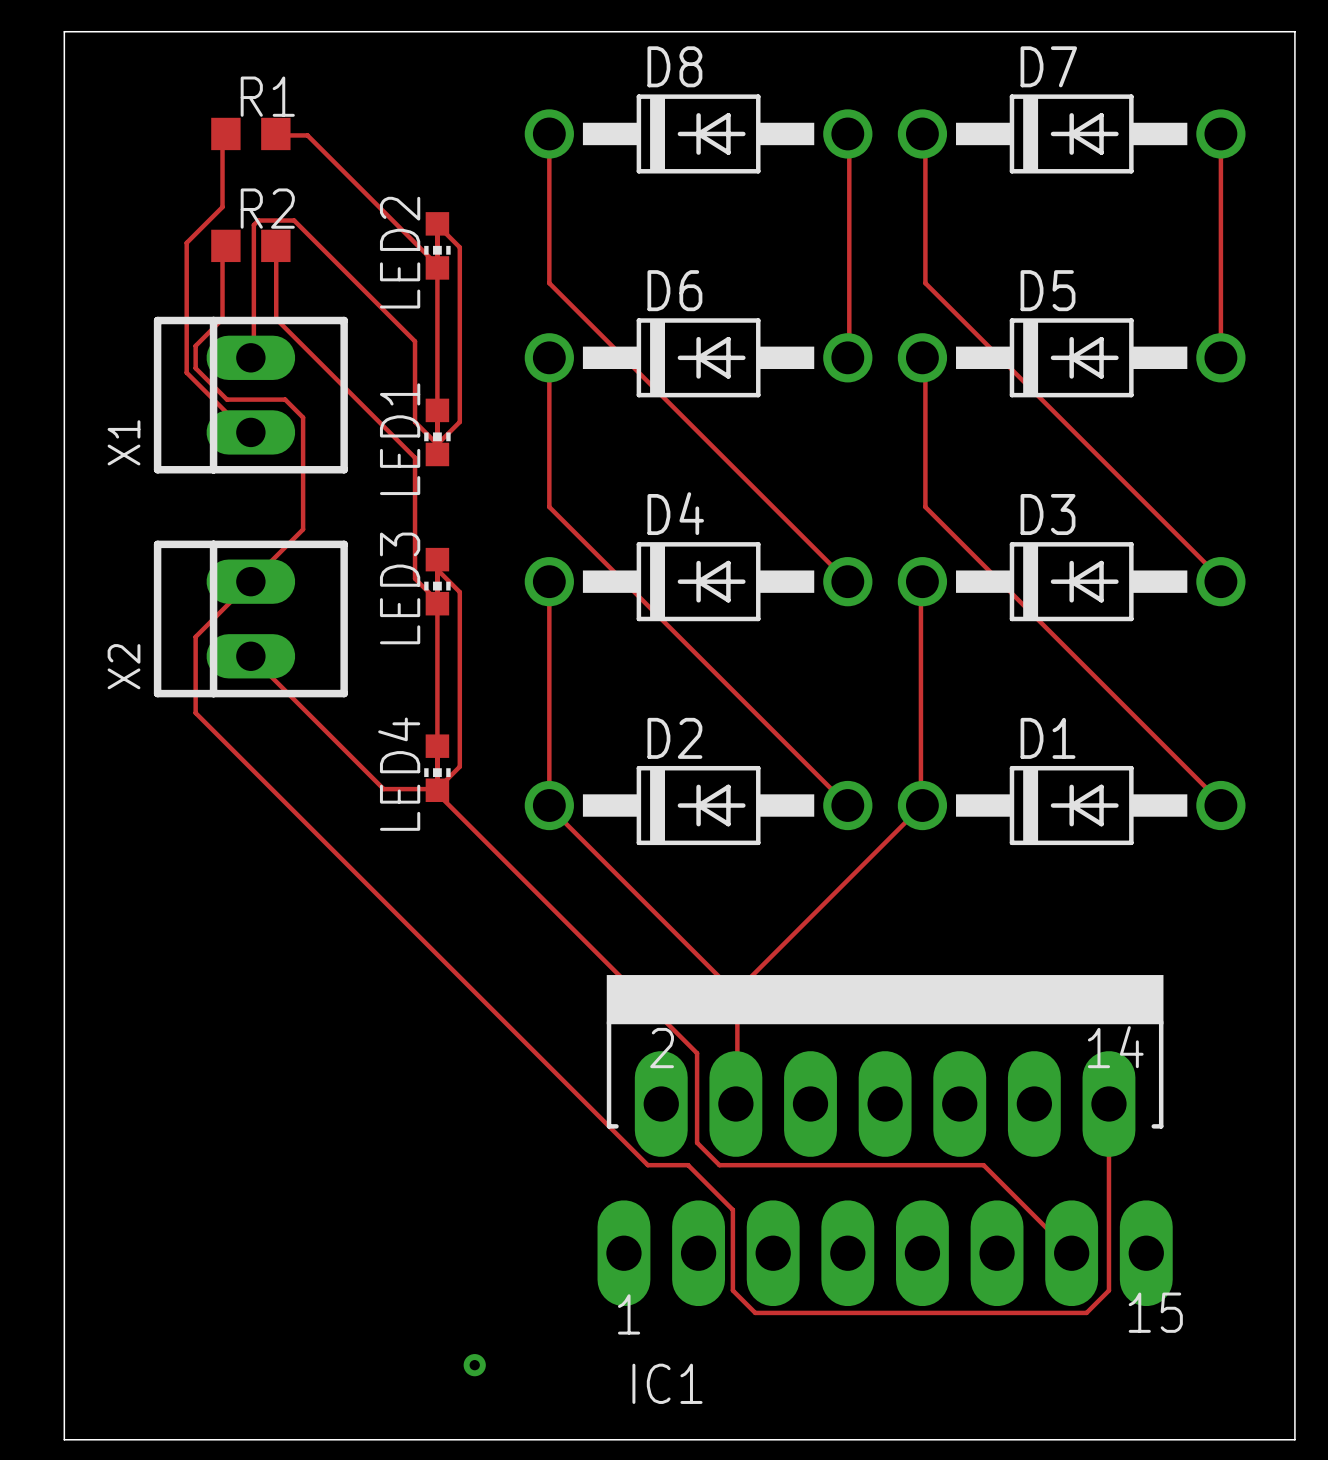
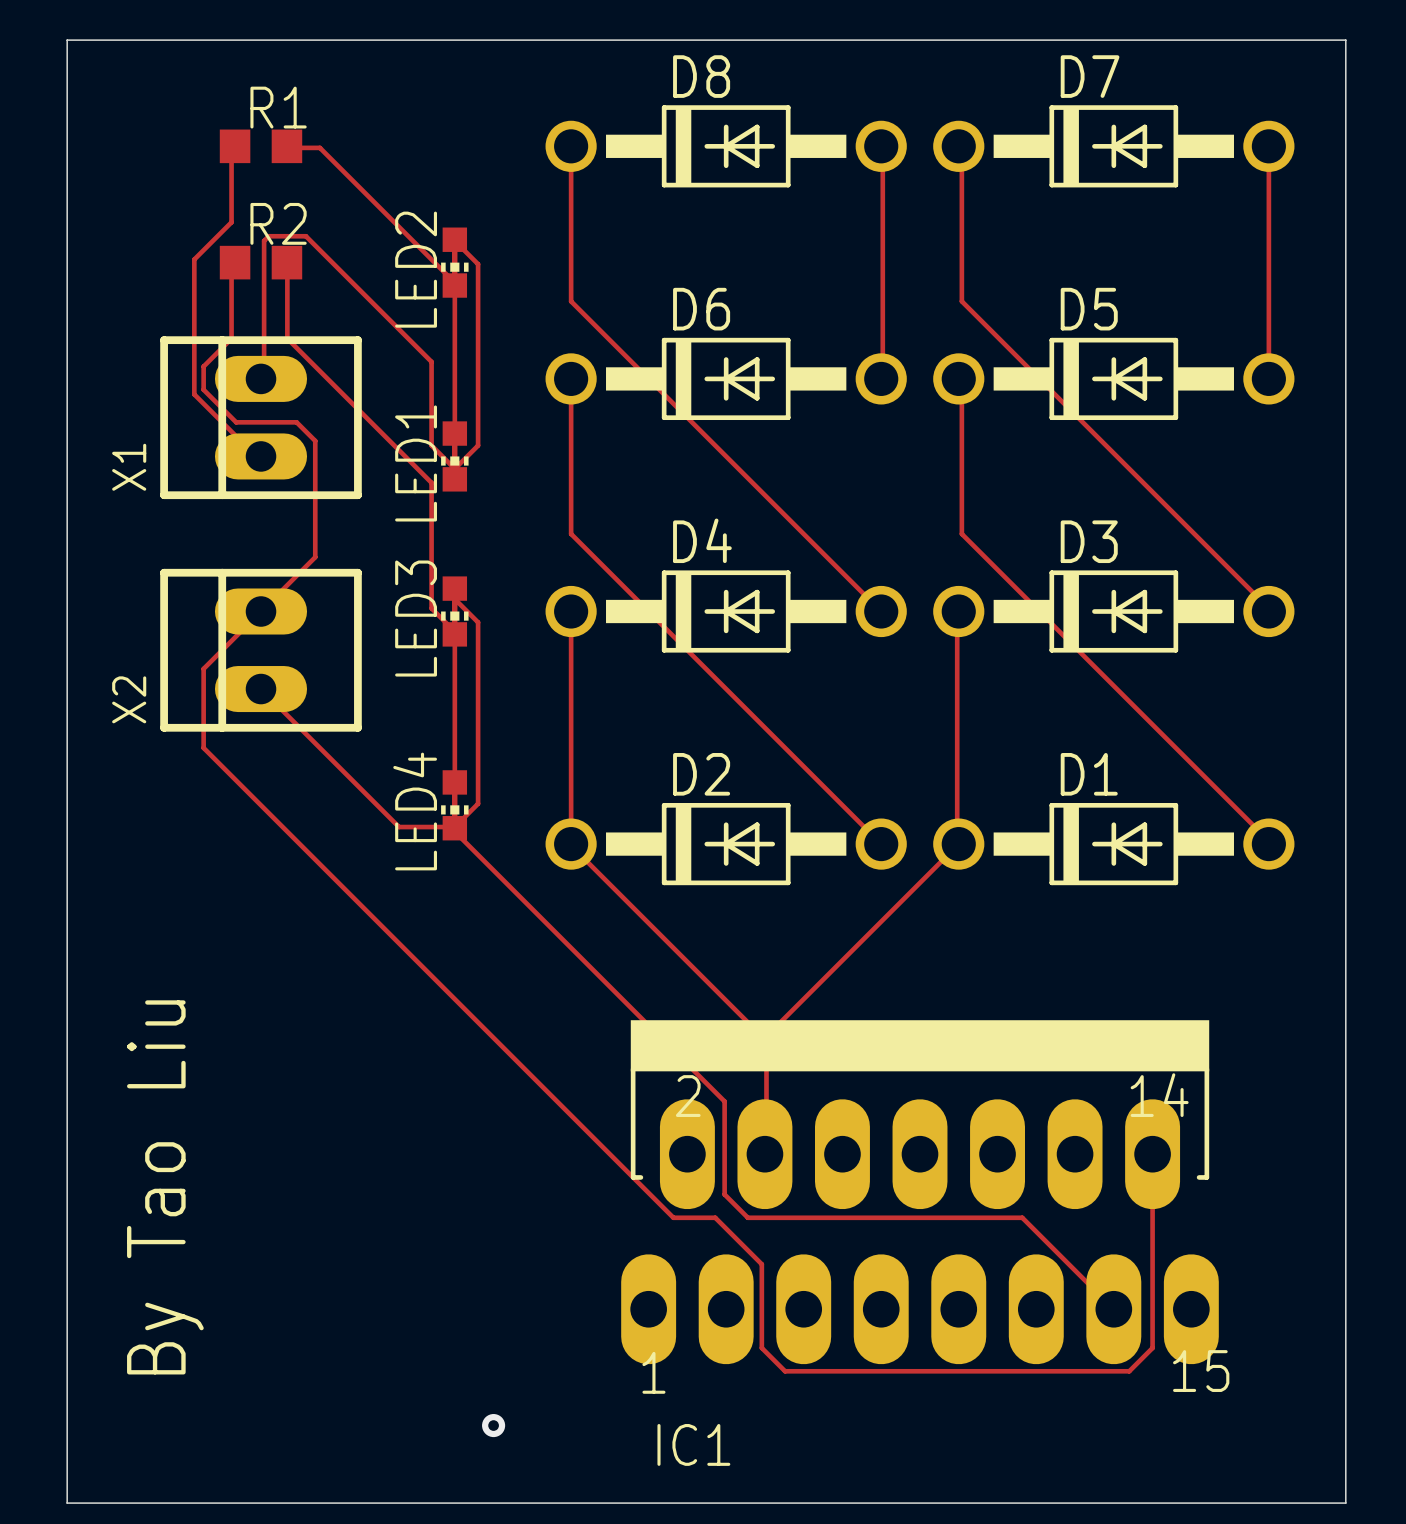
text: none -> By Tao Liu (165, 1187)

